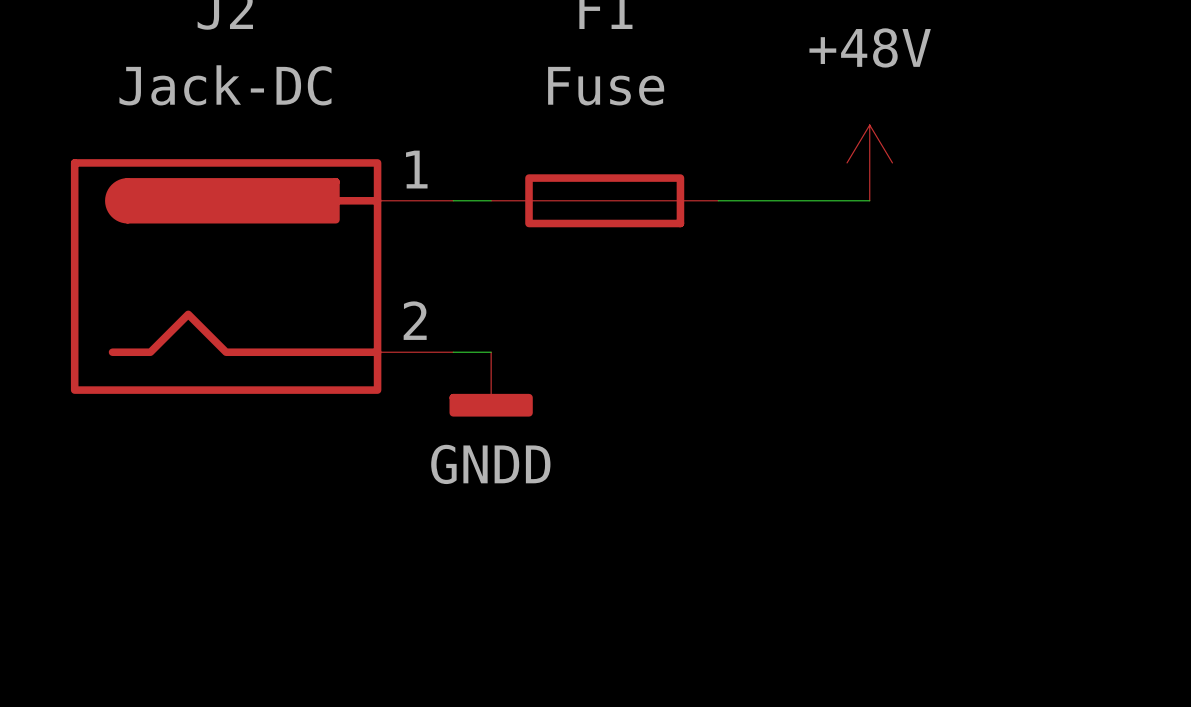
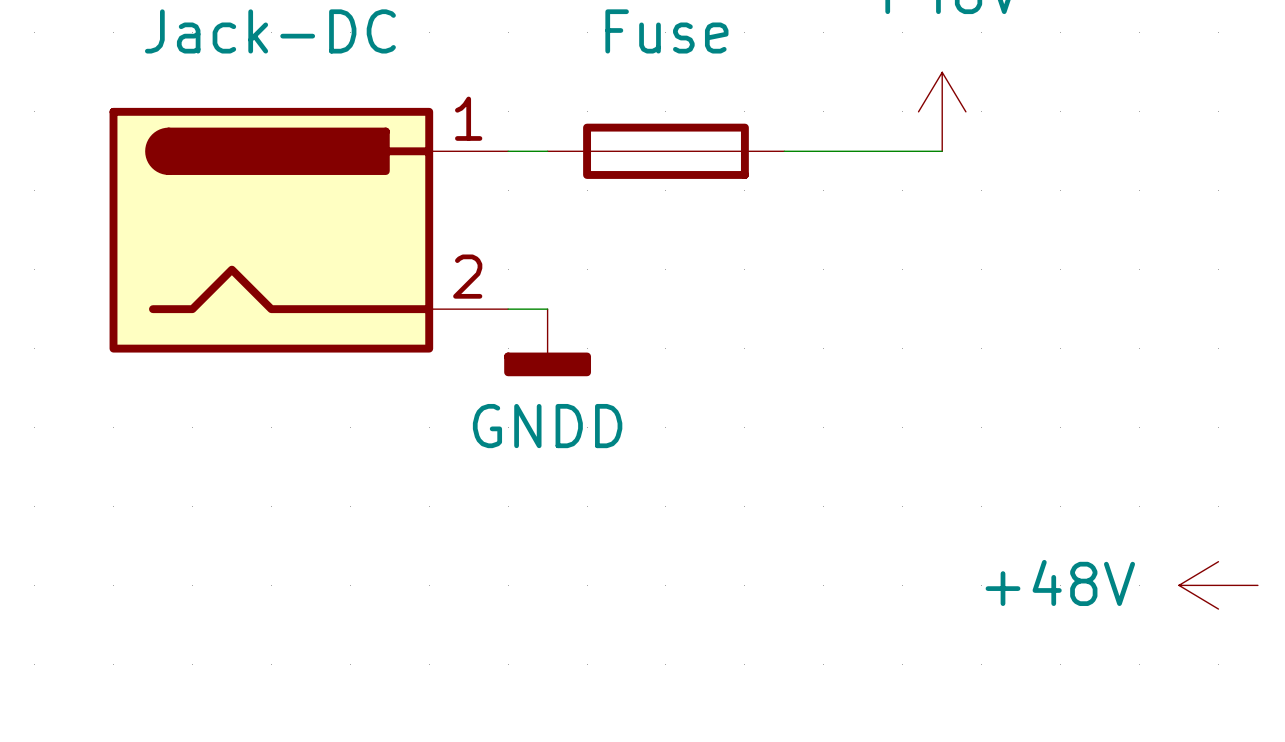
power symbol: none -> +48V (1218, 585)

